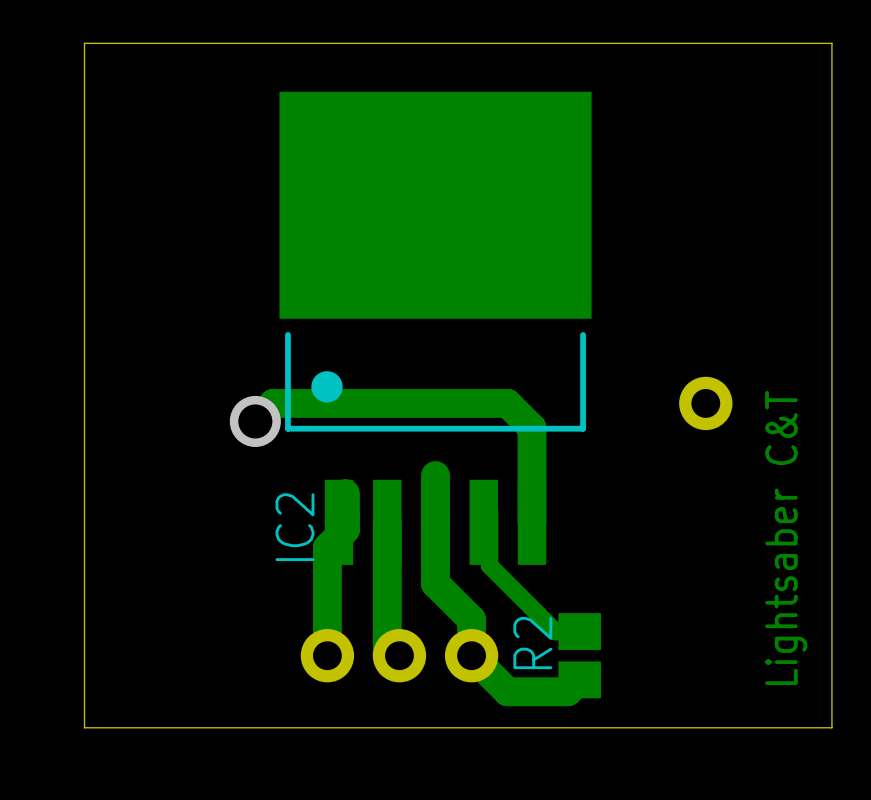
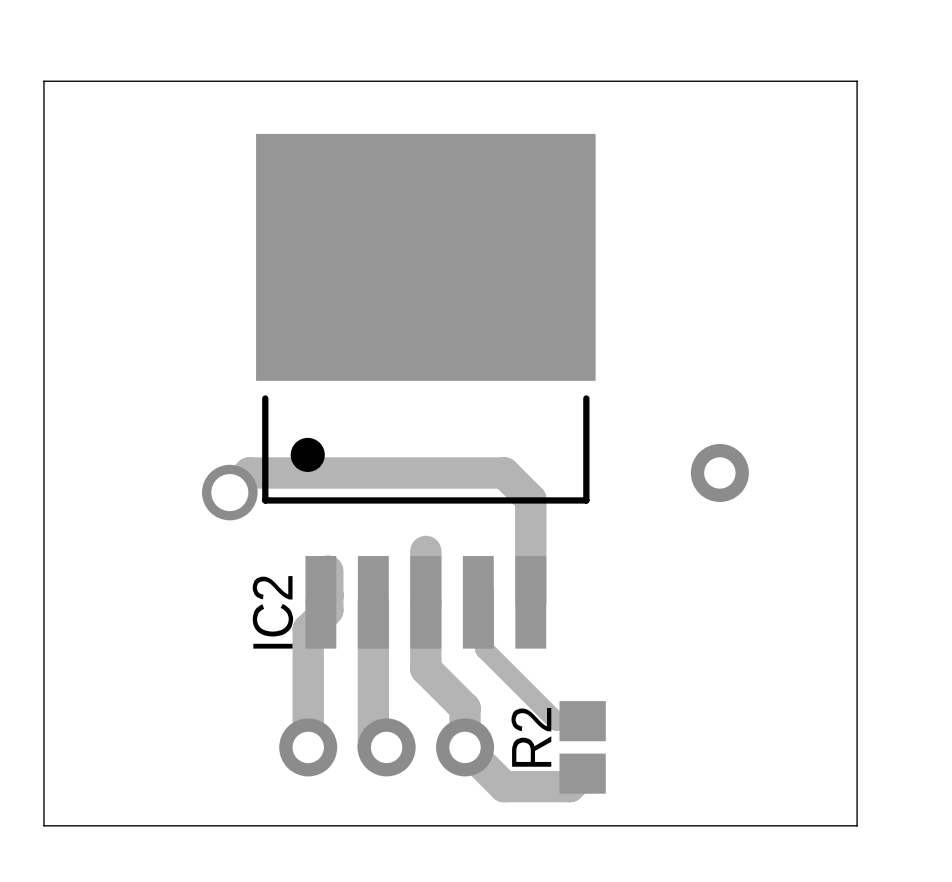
text: Lightsaber C&T (786, 537) -> none

